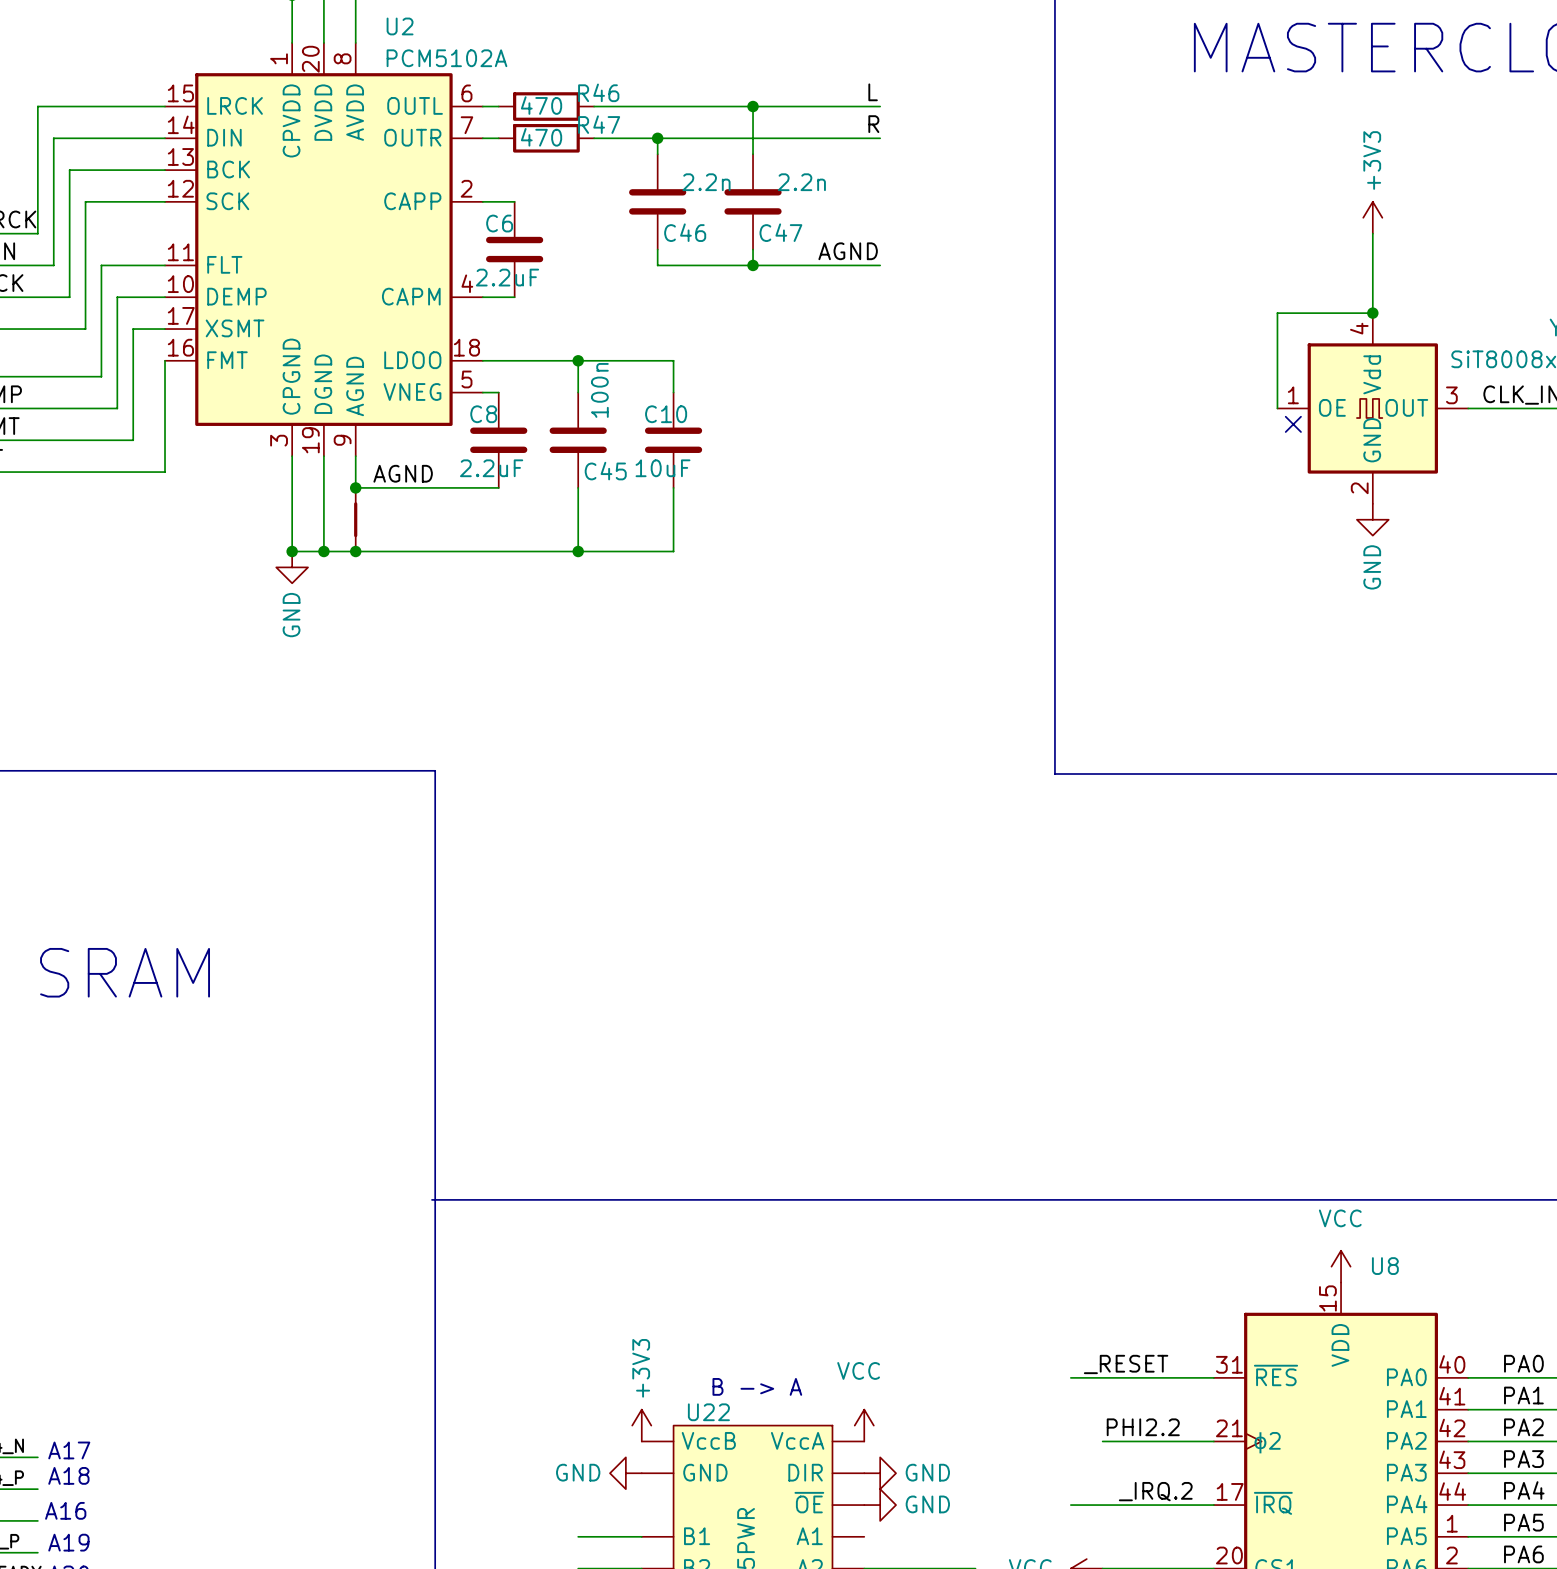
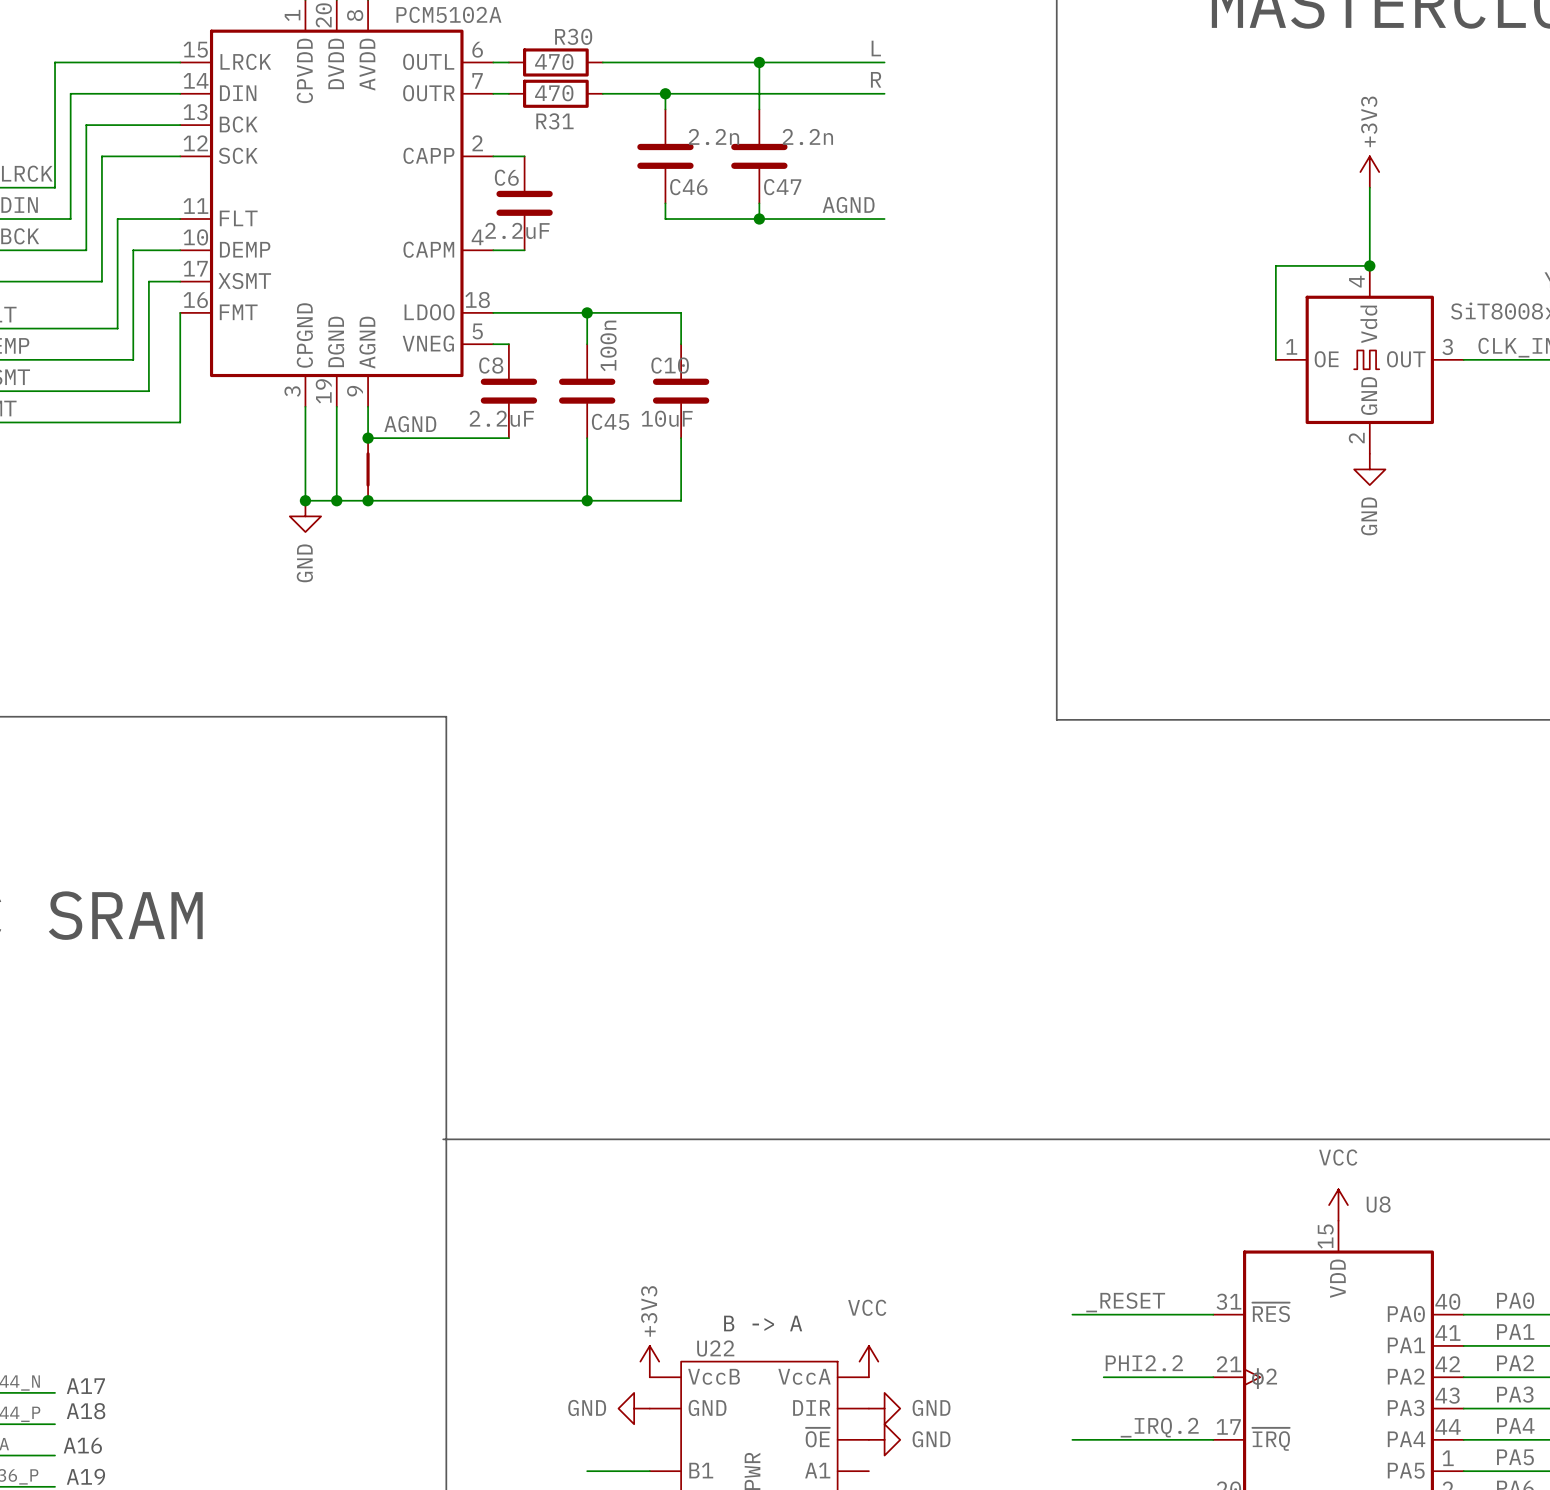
R46 name: R46 (598, 92) -> R30 (573, 36)
R47 name: R47 (599, 124) -> R31 (554, 121)
no-connect mark: (1293, 424) -> none

